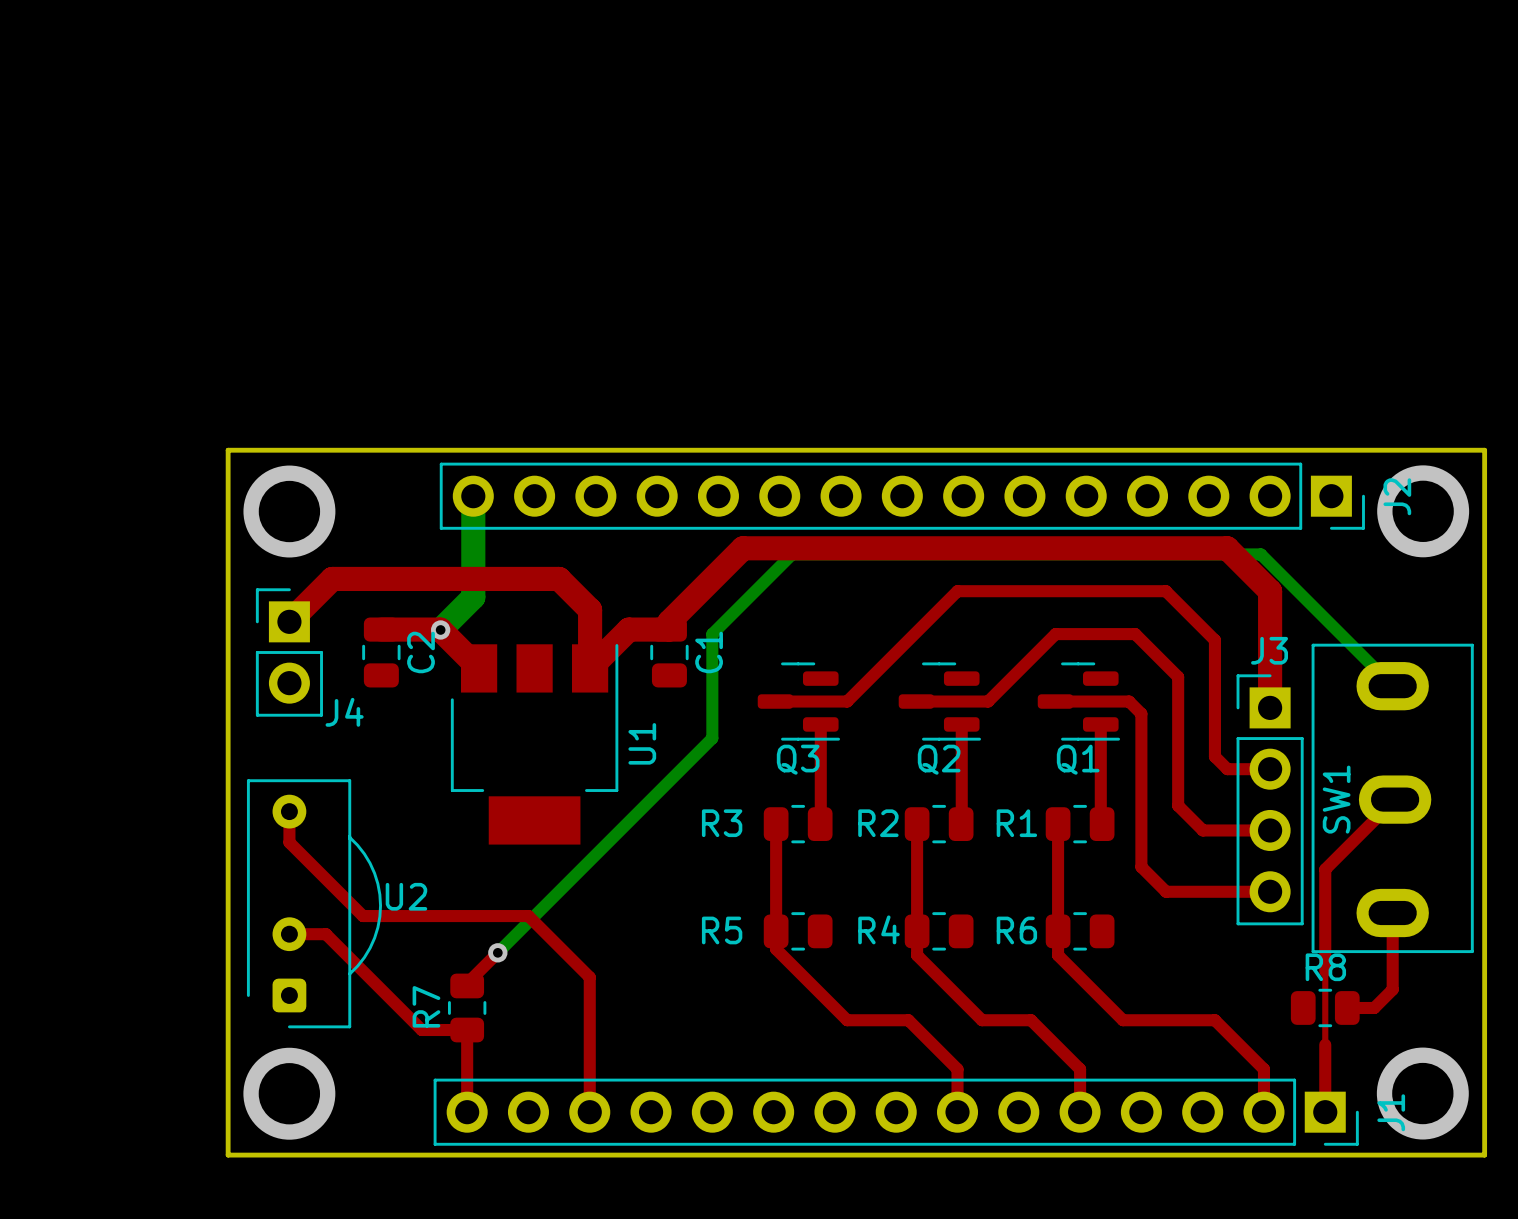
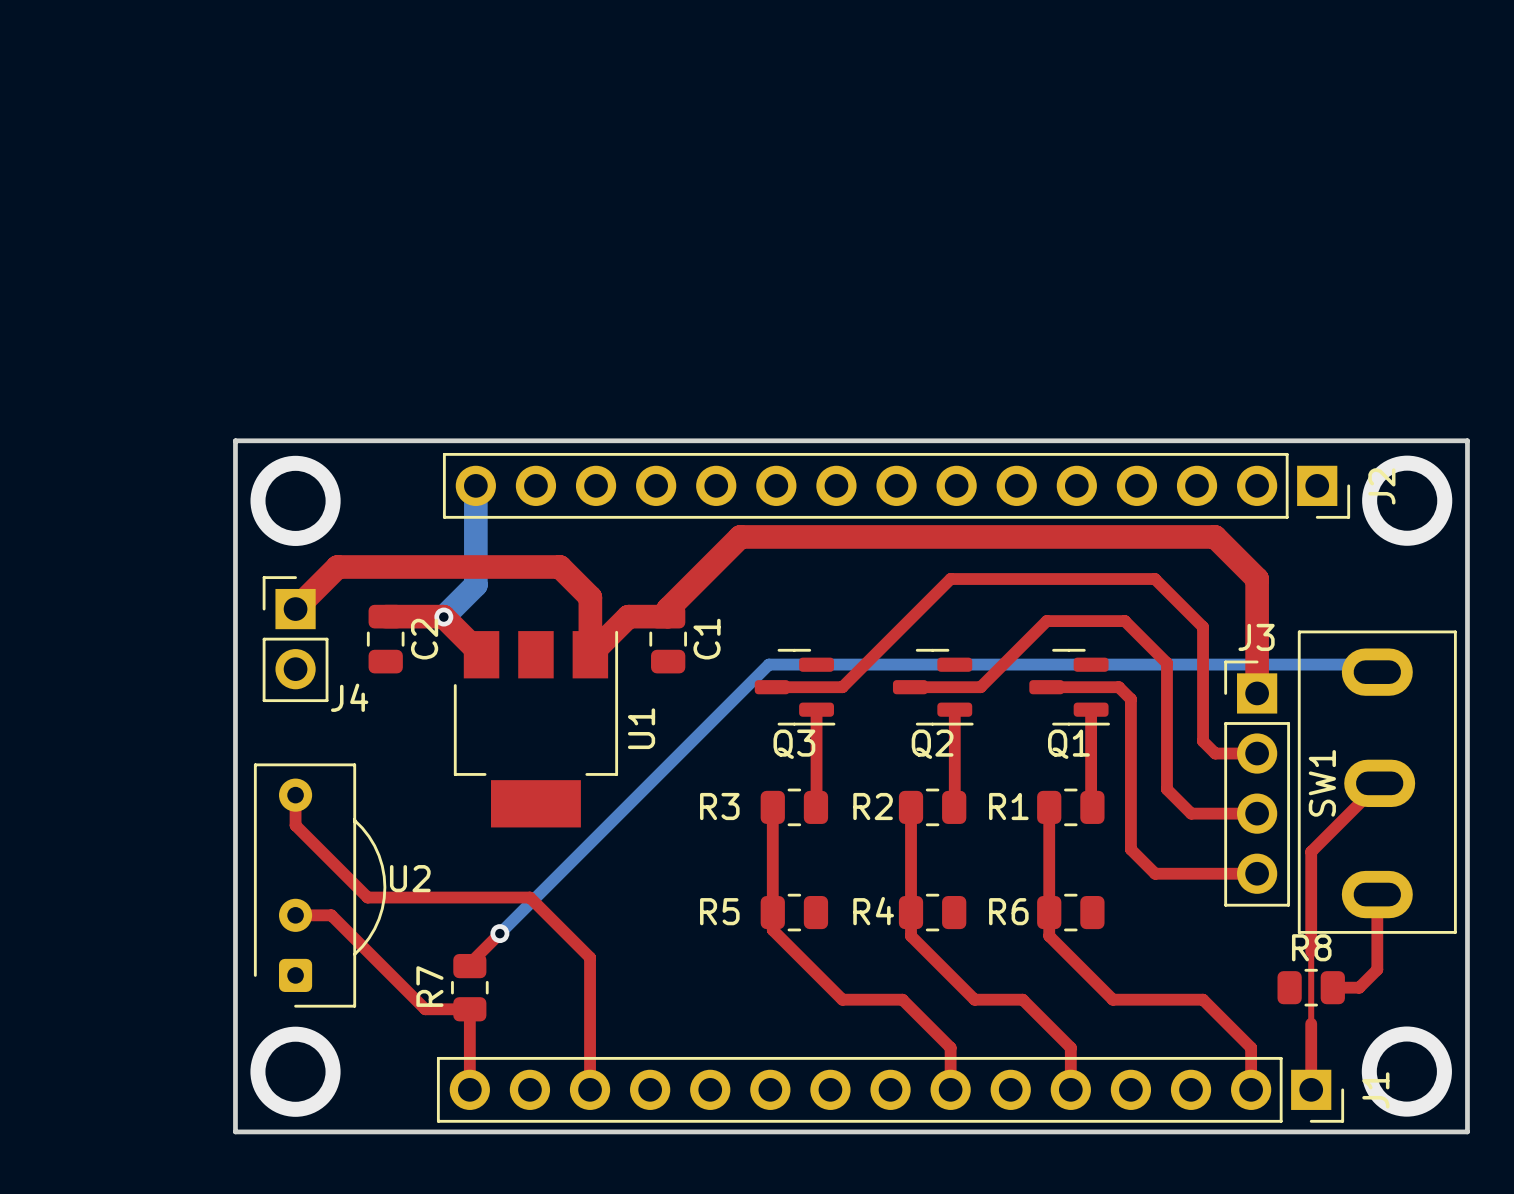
bottom track: (1384, 678) (1260, 554) (792, 554) (712, 634) (712, 738) -> (1369, 664) (768, 664) (710, 723)

